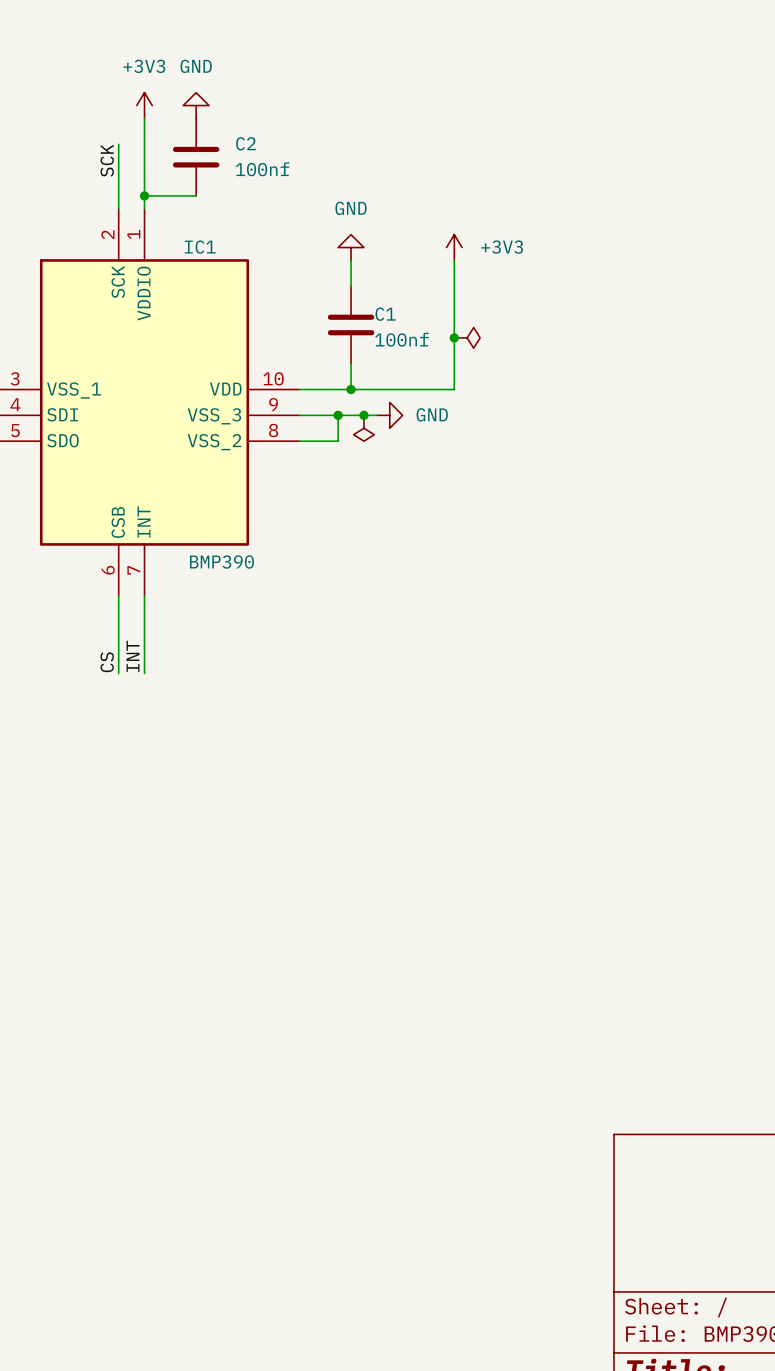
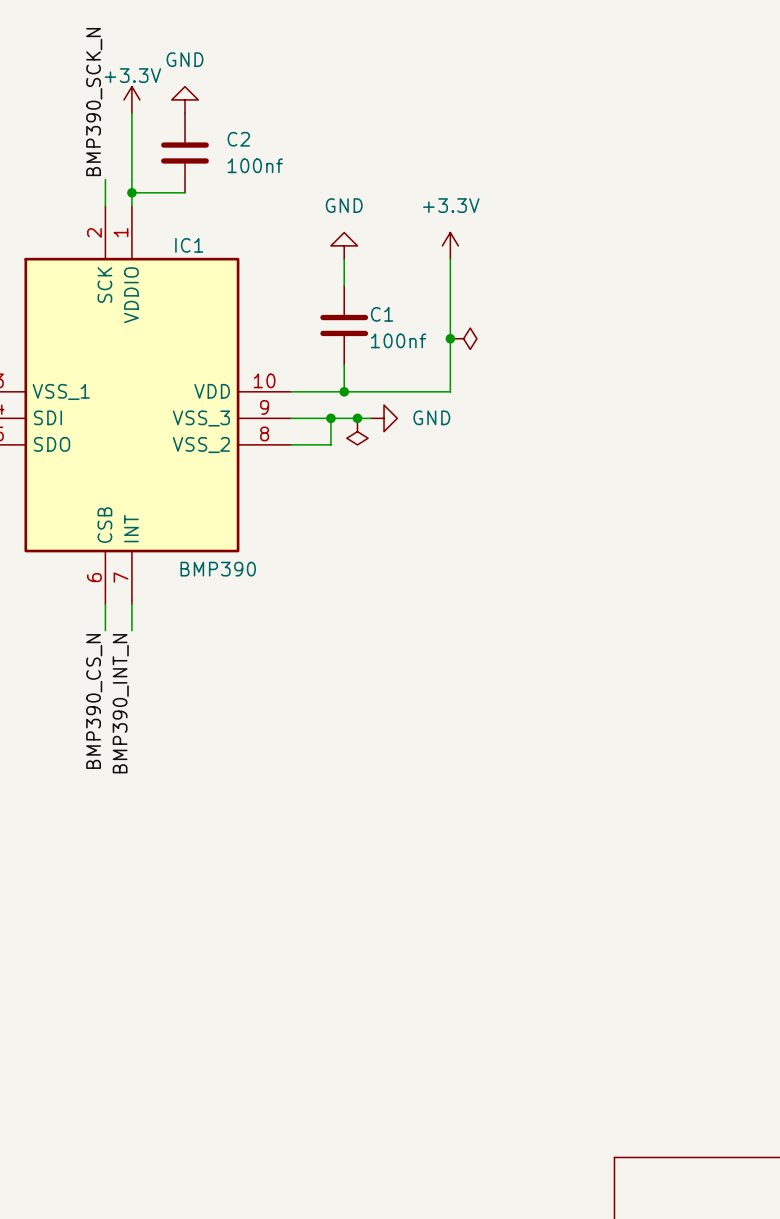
power symbol: +3V3 (144, 105) -> +3.3V (131, 99)
label: none -> BMP390_SCK_N (94, 102)
wire: (118, 144) (118, 183) -> none
label: SCK (107, 160) -> none
power symbol: +3V3 (454, 247) -> +3.3V (450, 245)
wire: (118, 621) (118, 673) -> none
wire: (144, 621) (144, 673) -> none
label: INT (133, 656) -> none
label: CS (107, 662) -> none
label: none -> BMP390_CS_N (94, 701)
label: none -> BMP390_INT_N (120, 703)

